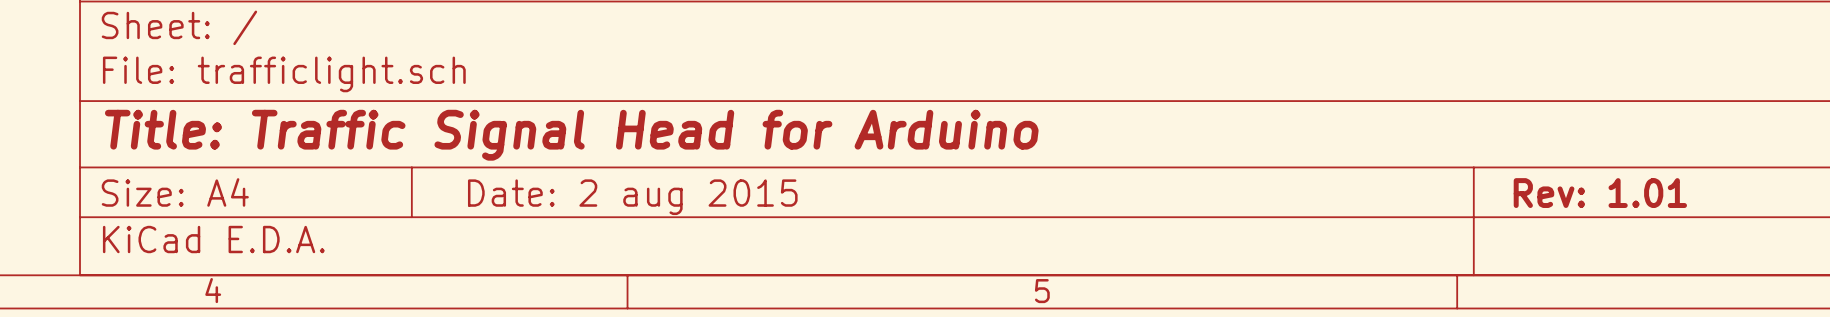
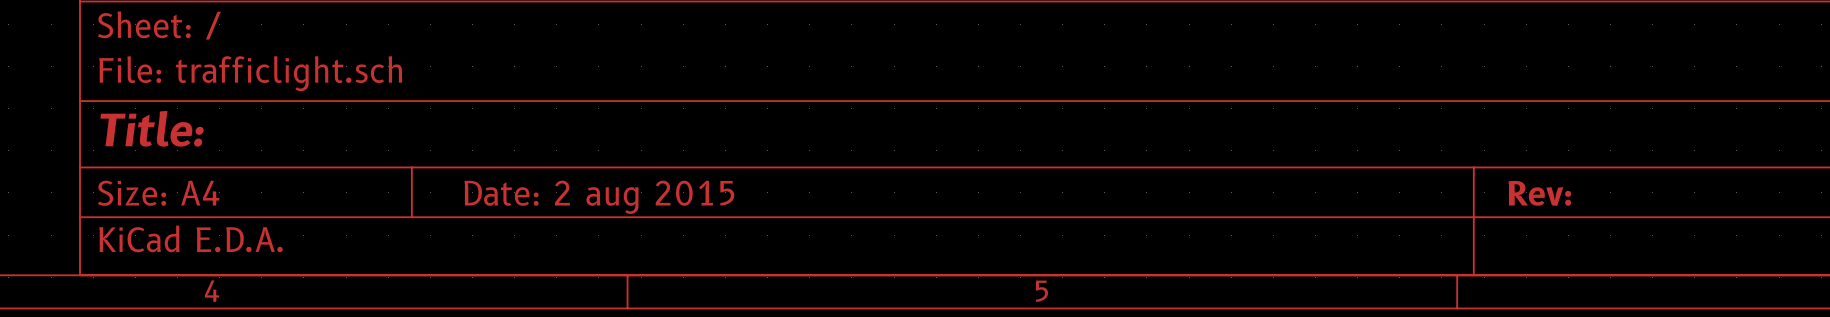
title block: Title: Traffic Signal Head for Arduino (571, 135) -> Title: (152, 128)
title block: Rev: 1.01 (1600, 193) -> Rev: (1539, 193)

